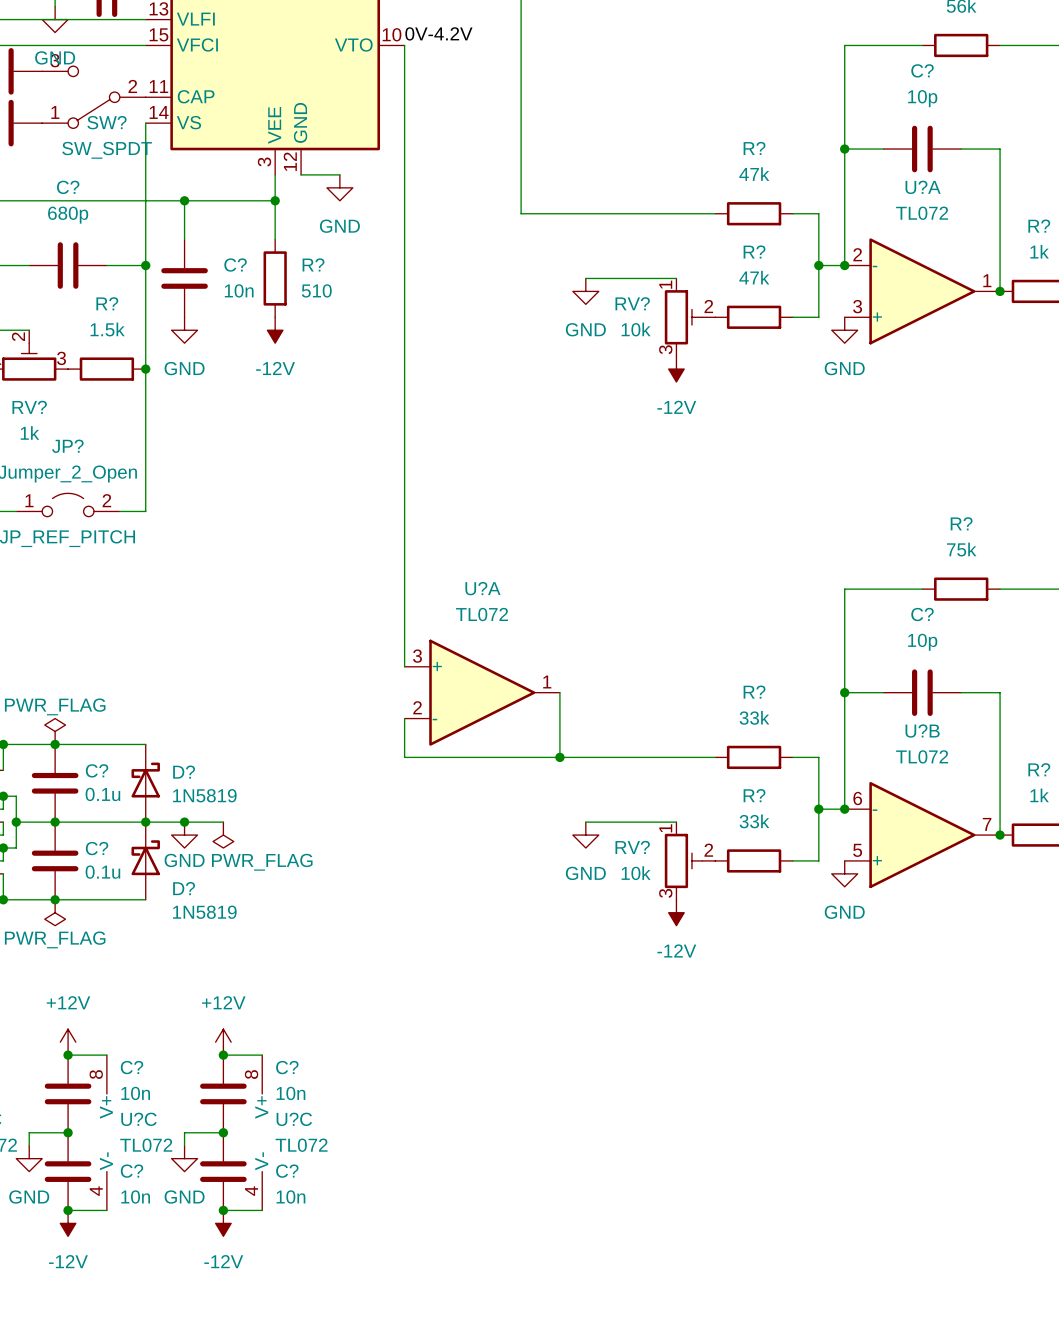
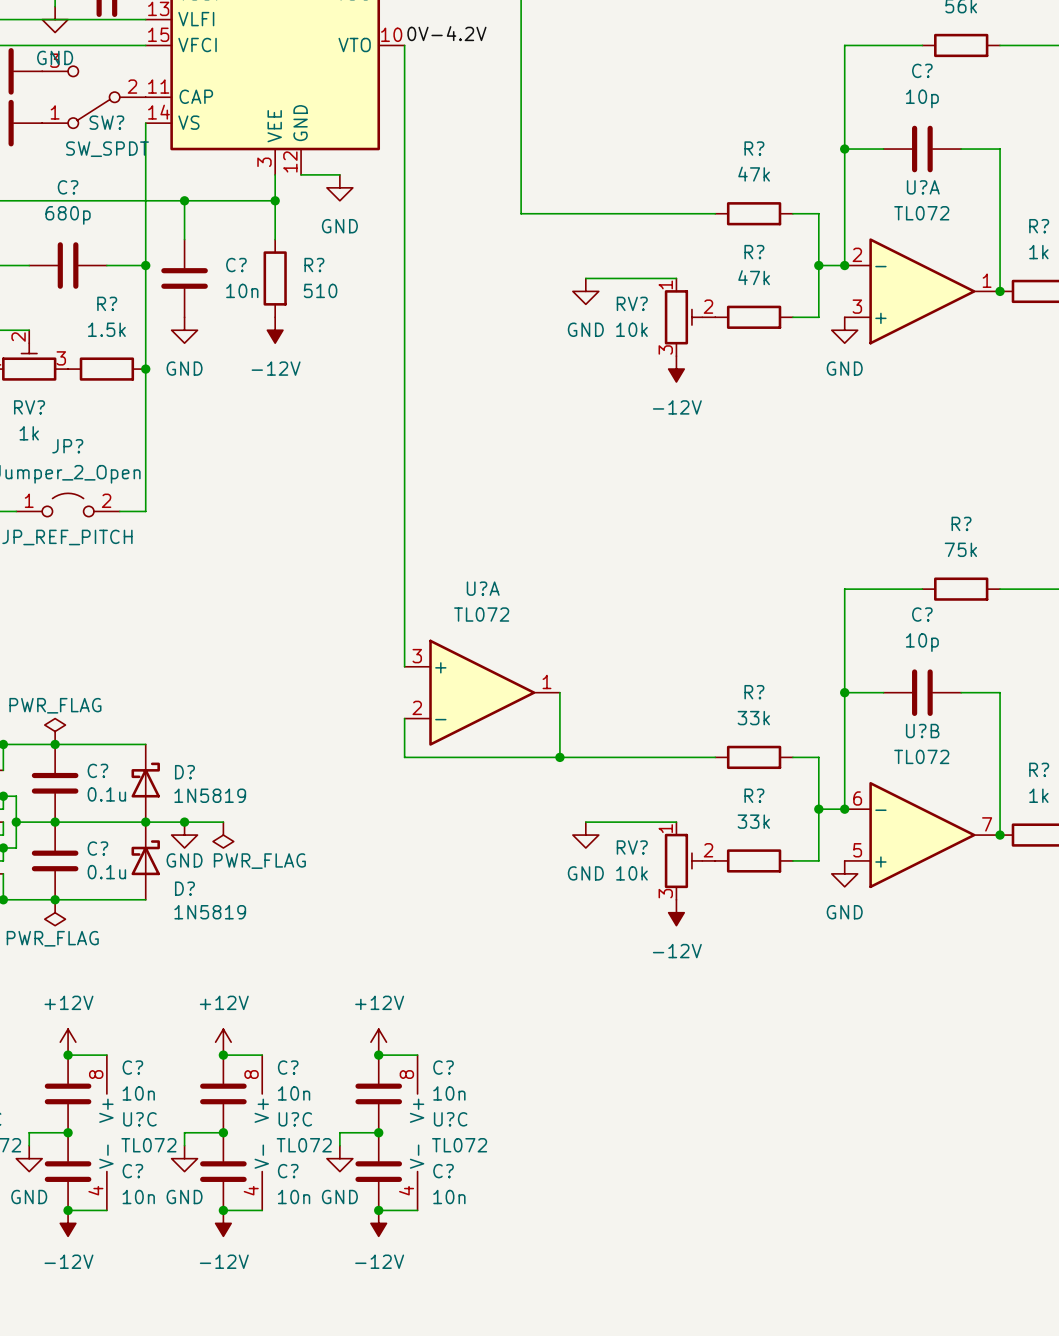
power symbol: none -> +12V (378, 1042)
wire: none -> (378, 1055) (417, 1055)
junction: none -> (378, 1055)
C?: none -> 10n (378, 1093)
wire: none -> (378, 1132) (339, 1132) (339, 1145)
junction: none -> (378, 1132)
U?C: none -> TL072 (417, 1132)
power symbol: none -> GND (339, 1158)
C?: none -> 10n (378, 1171)
wire: none -> (378, 1210) (417, 1210)
junction: none -> (378, 1210)
power symbol: none -> -12V (378, 1223)

